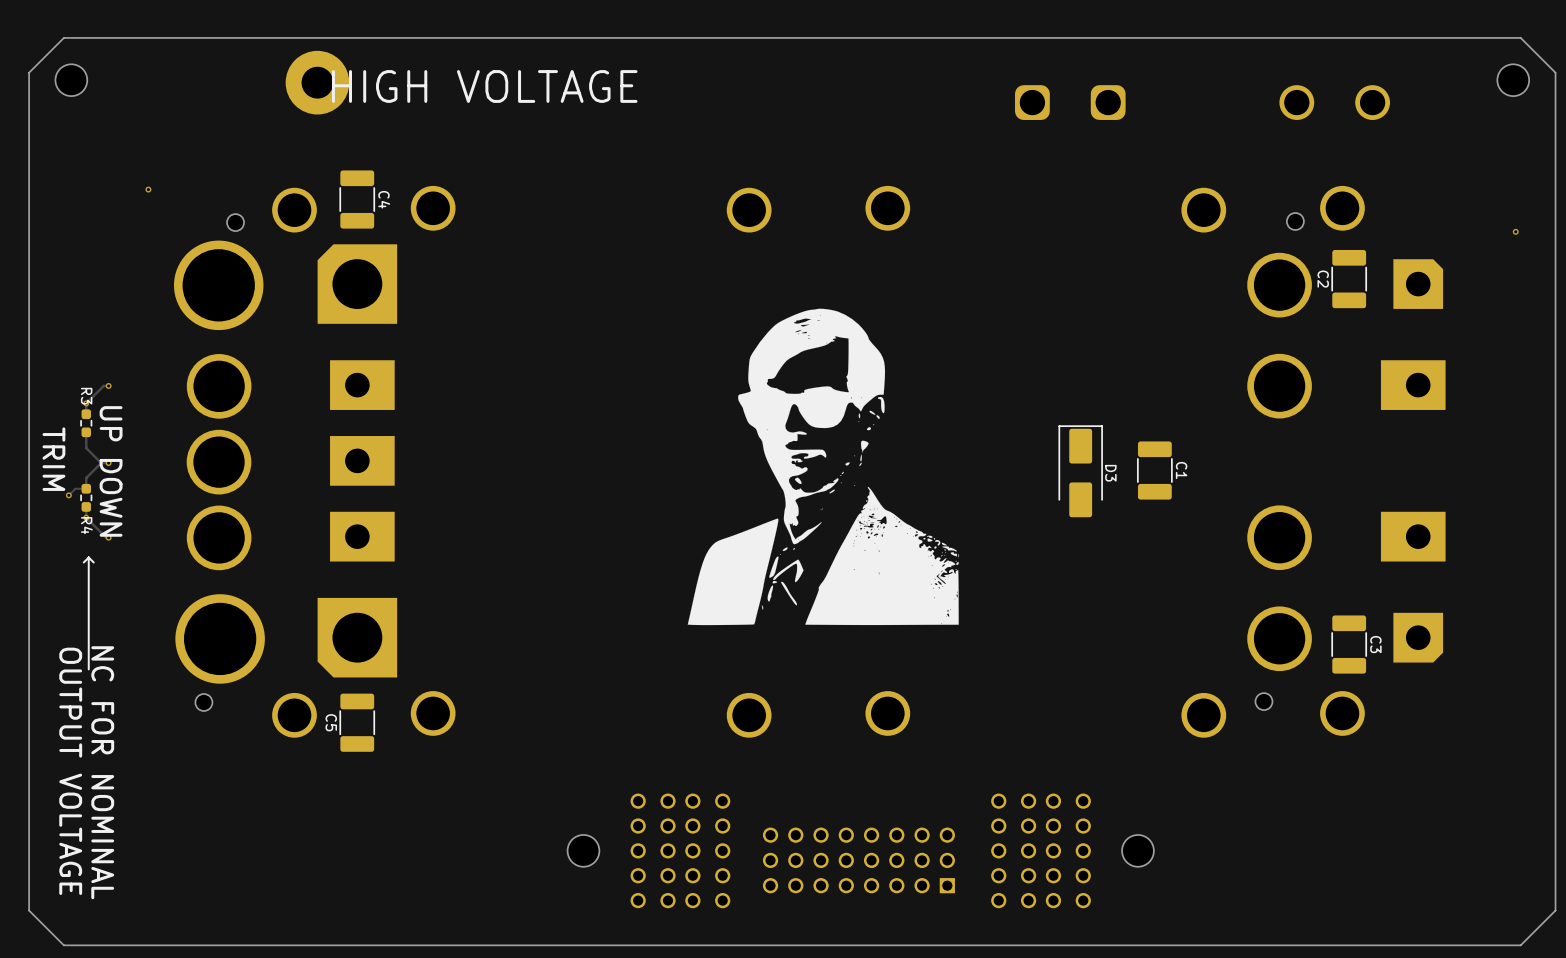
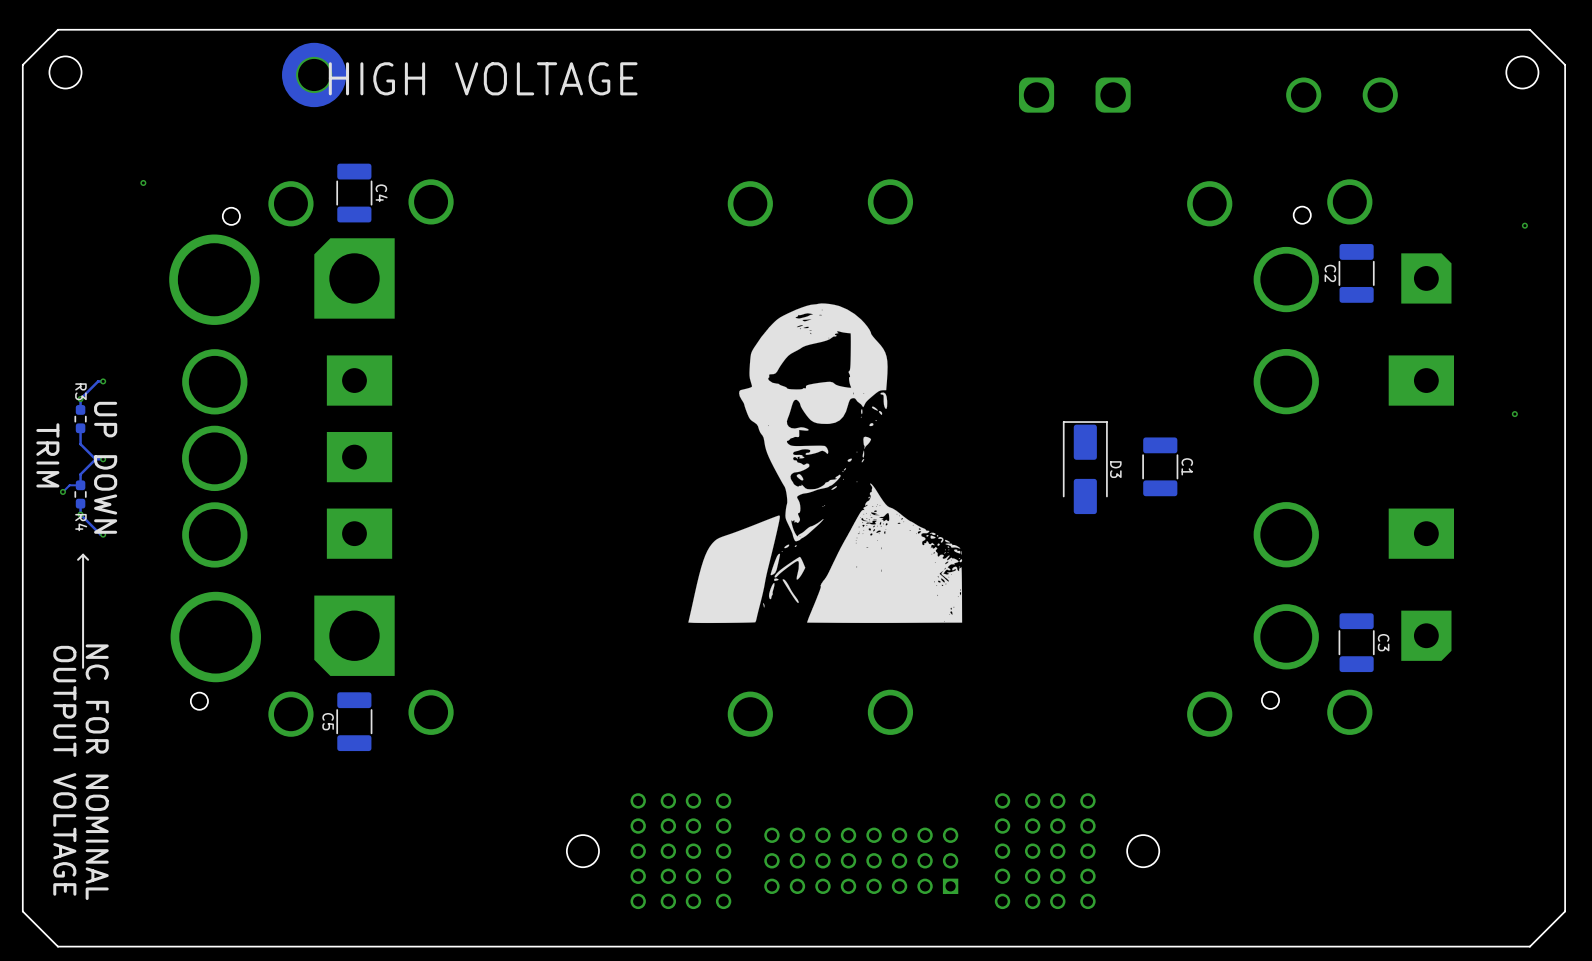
via: none -> (1514, 414)

